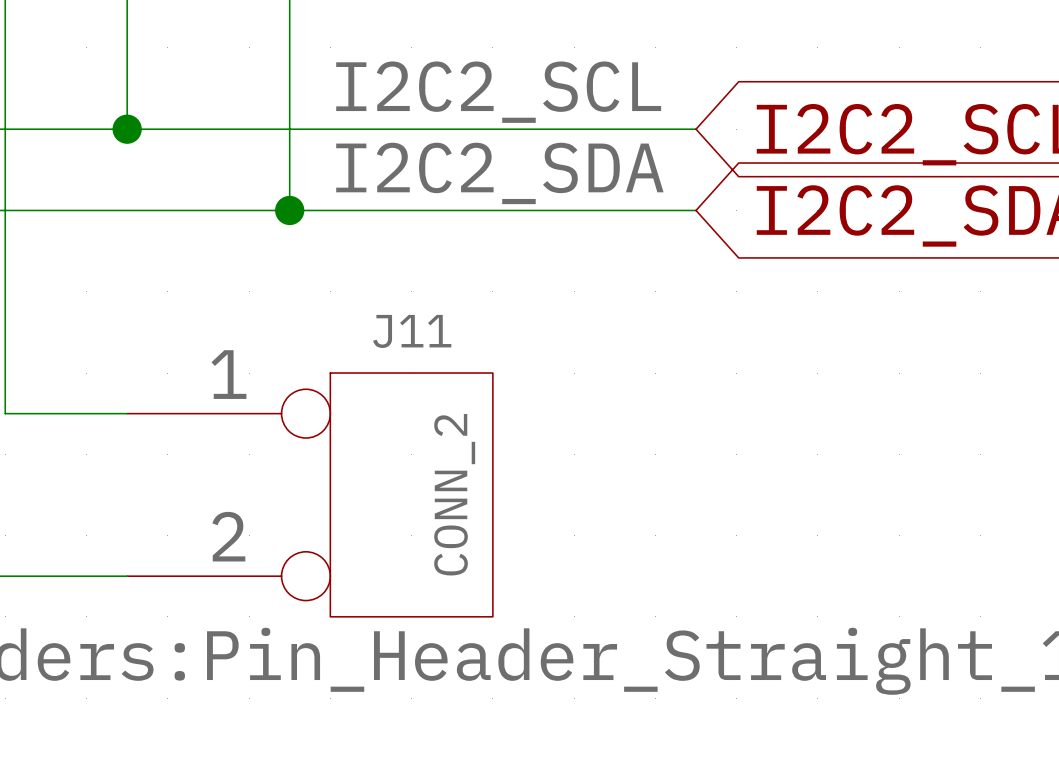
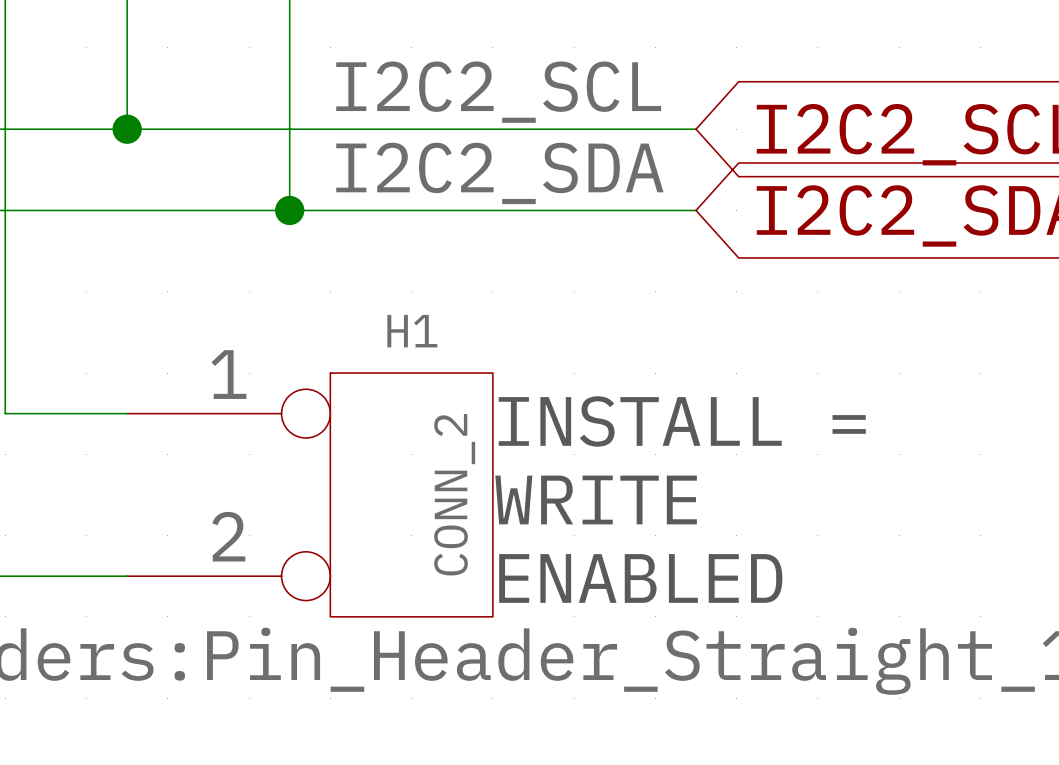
J11 name: J11 (412, 331) -> H1 (412, 331)
text: none -> INSTALL = (682, 421)
text: none -> WRITE (596, 499)
text: none -> ENABLED (640, 578)

